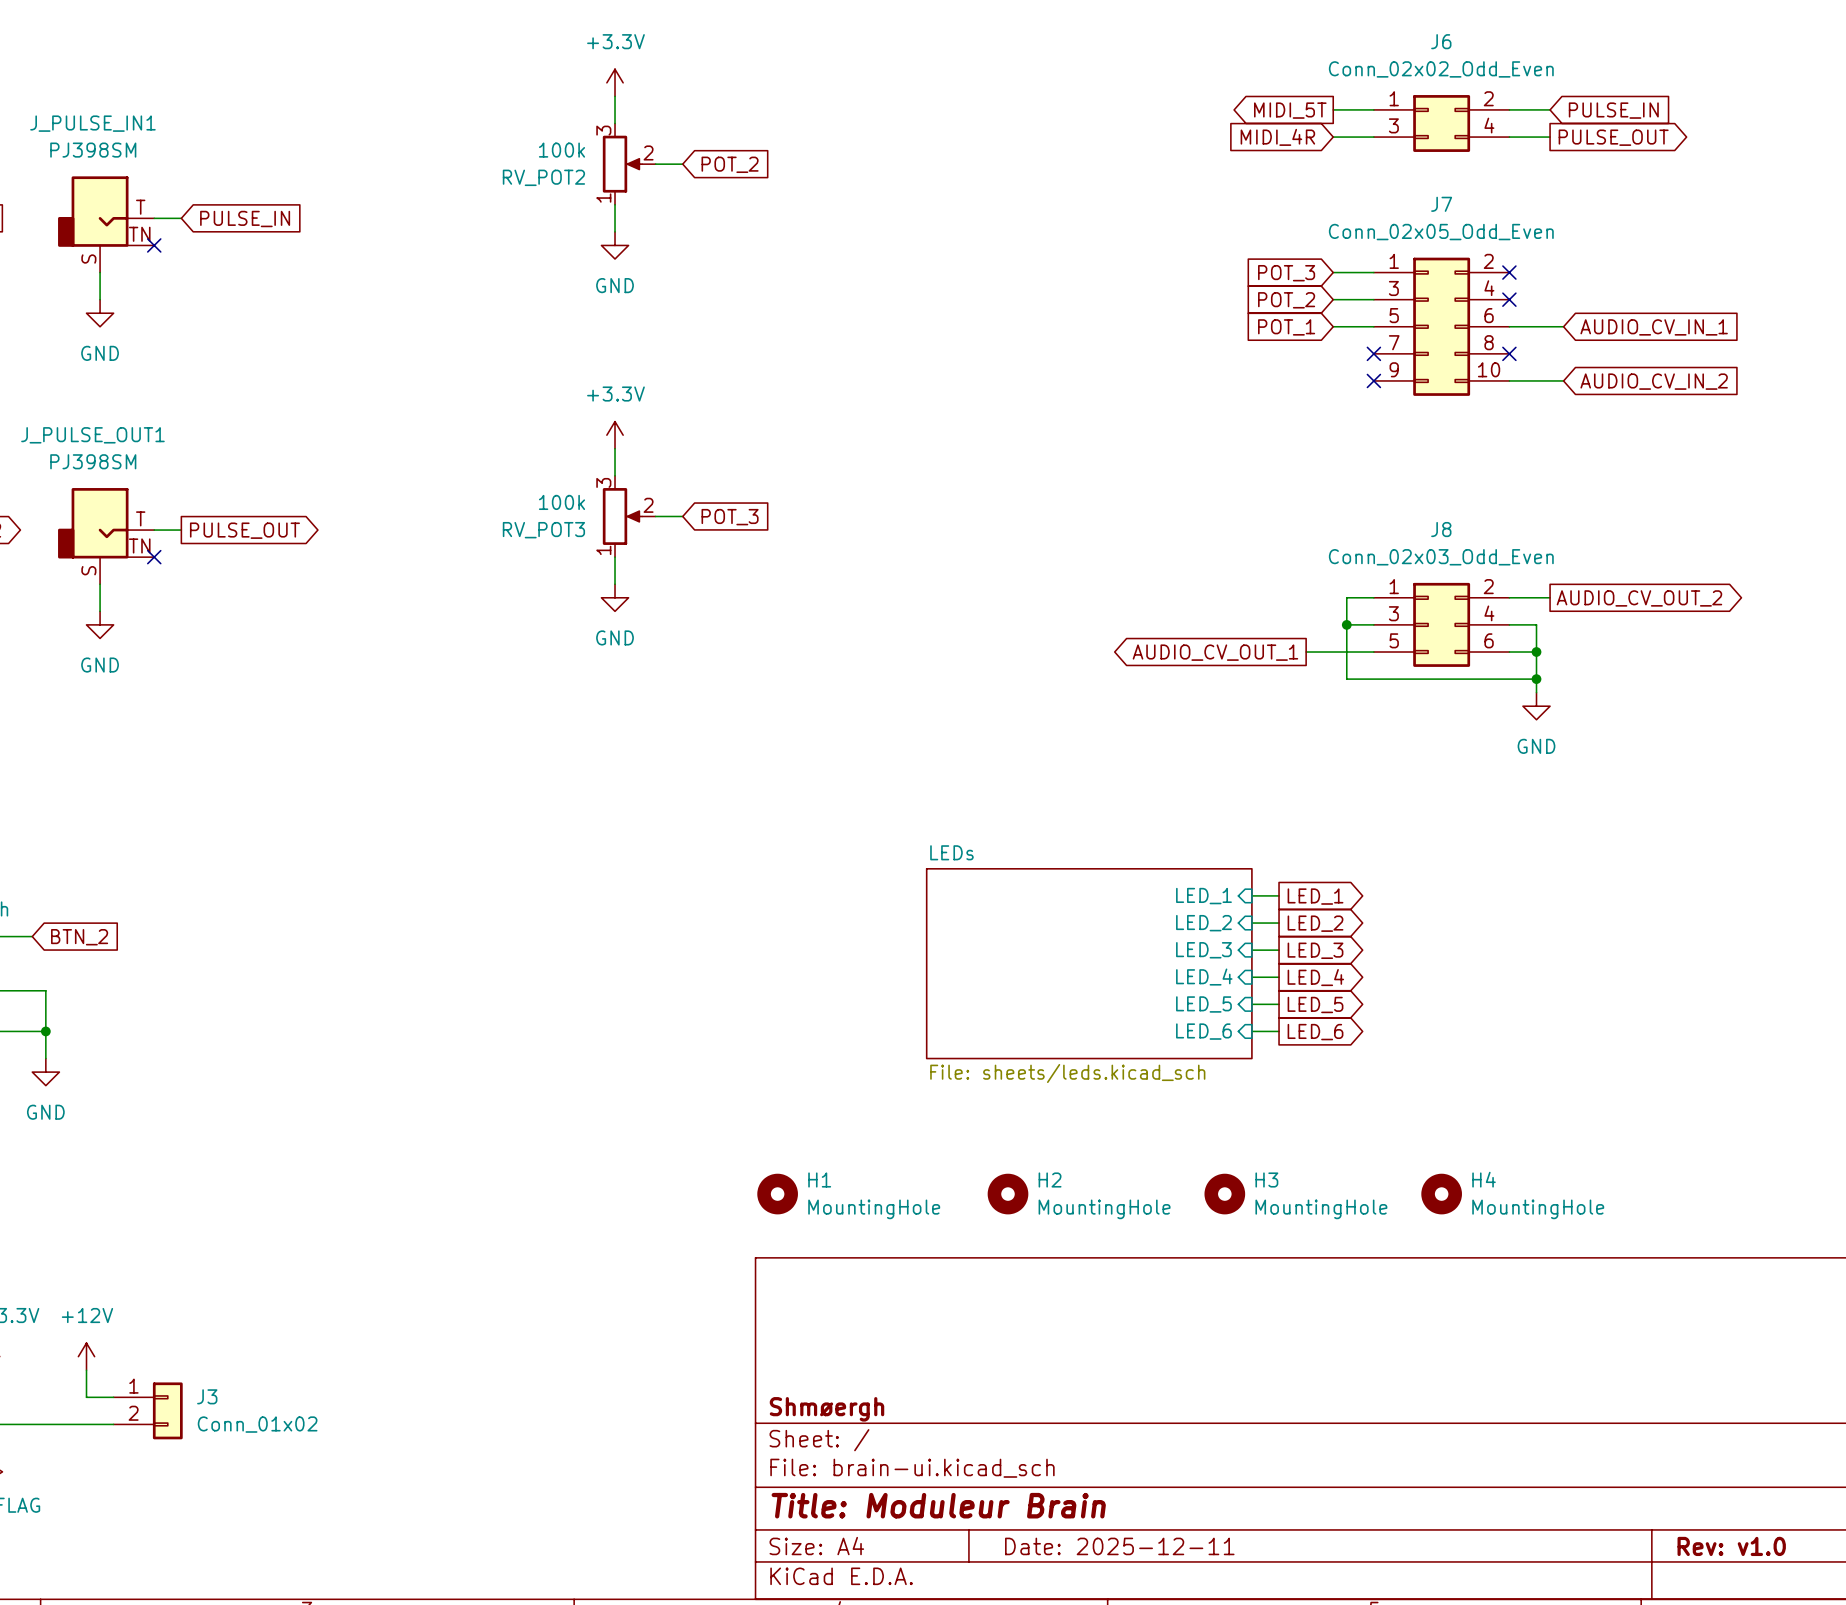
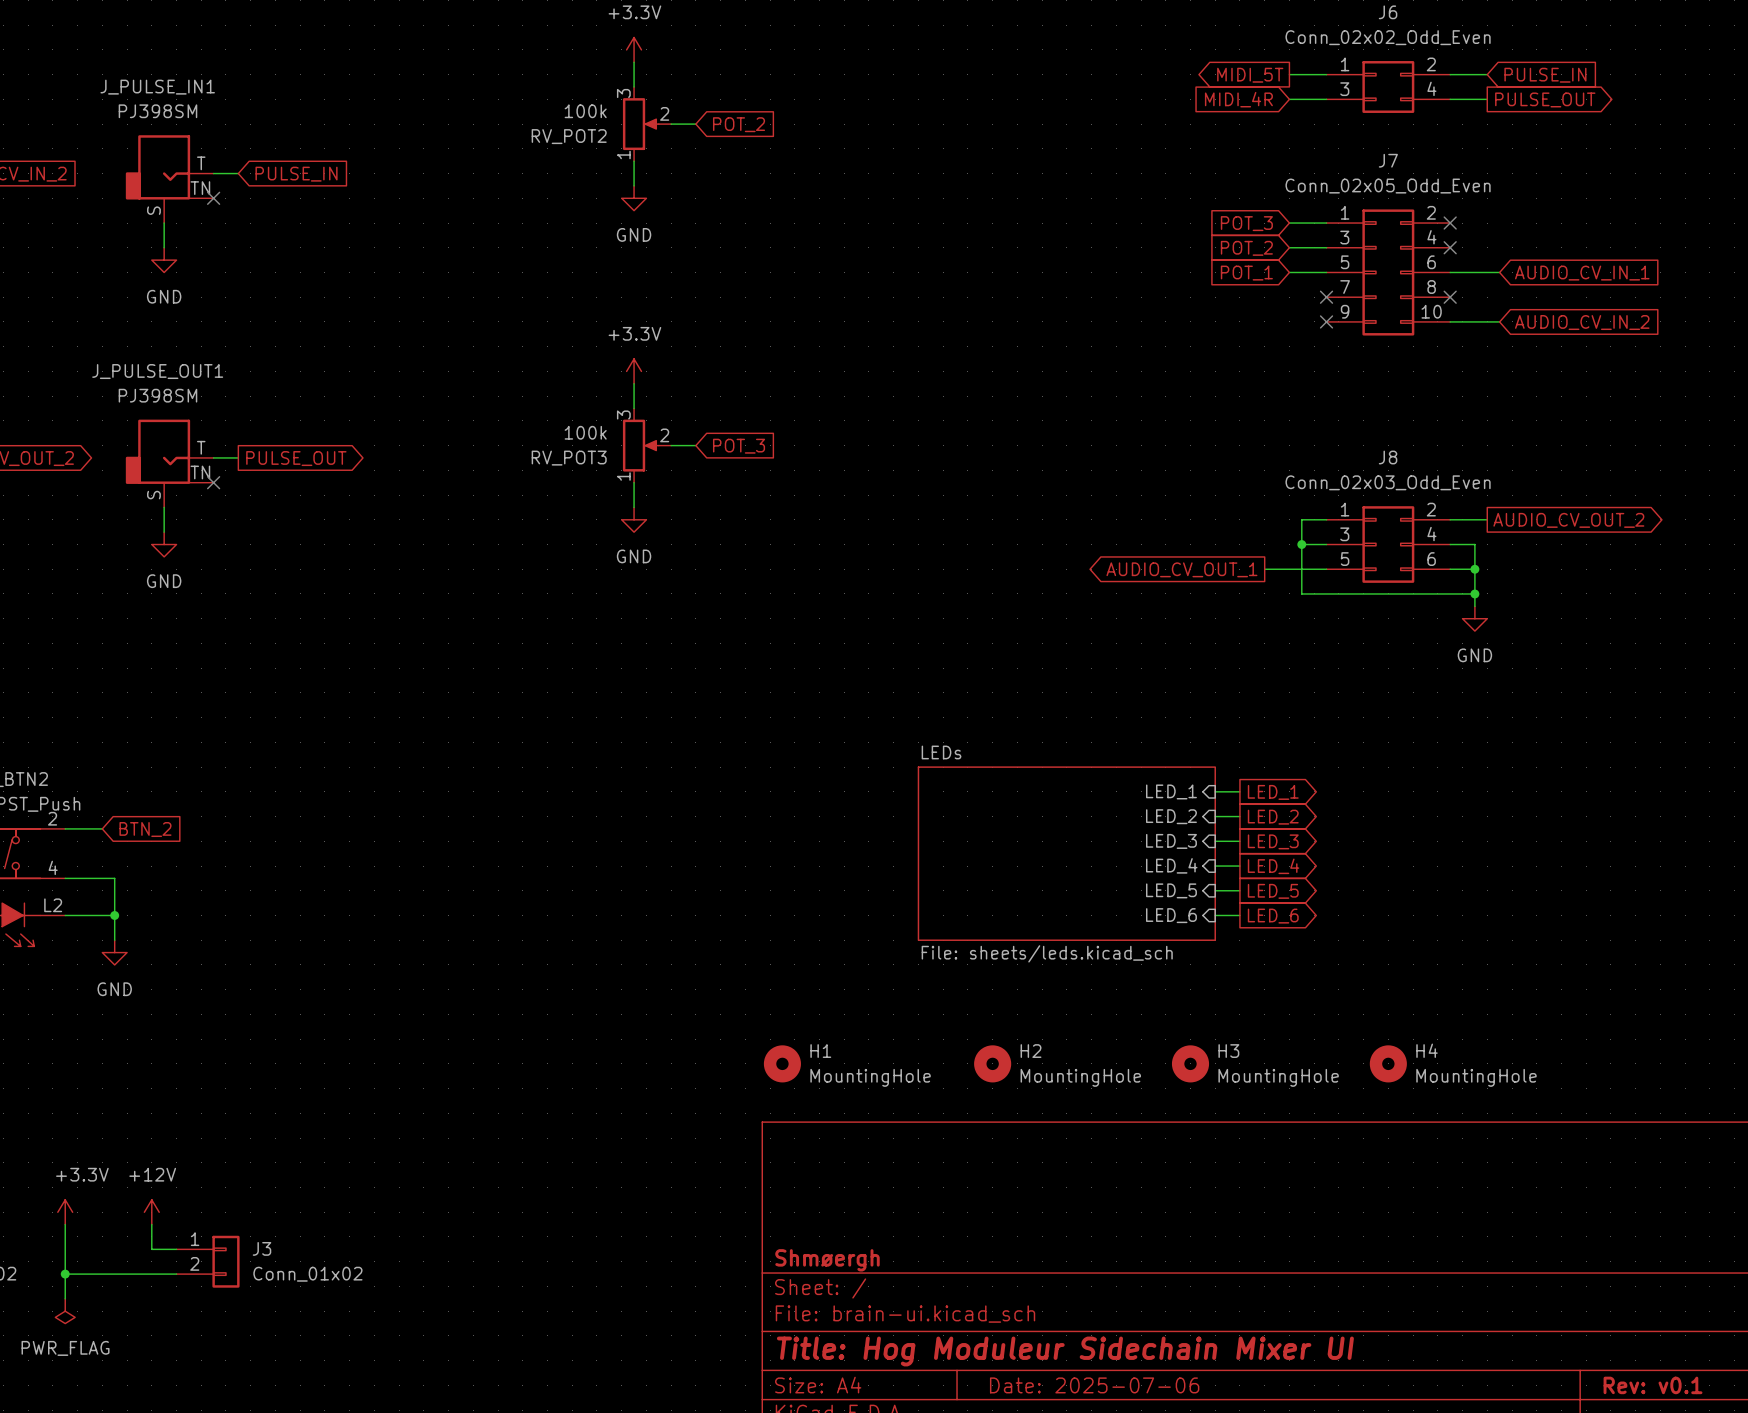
title block: Title: Moduleur Brain (938, 1505) -> Title: Hog Moduleur Sidechain Mixer UI (1065, 1351)
title block: Date: 2025-12-11 (1119, 1546) -> Date: 2025-07-06 (1094, 1385)
title block: Rev: v1.0 (1731, 1546) -> Rev: v0.1 (1653, 1385)

